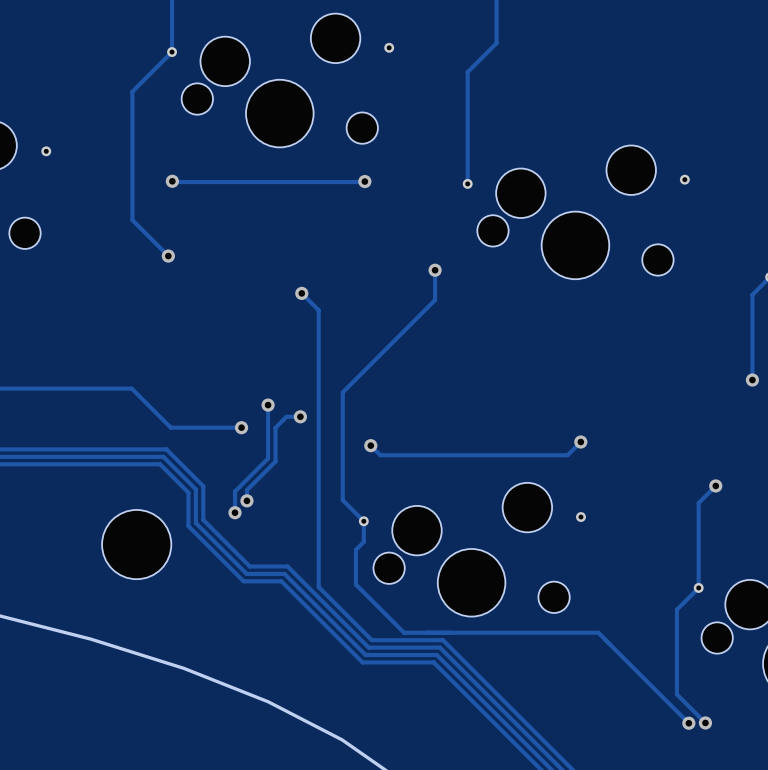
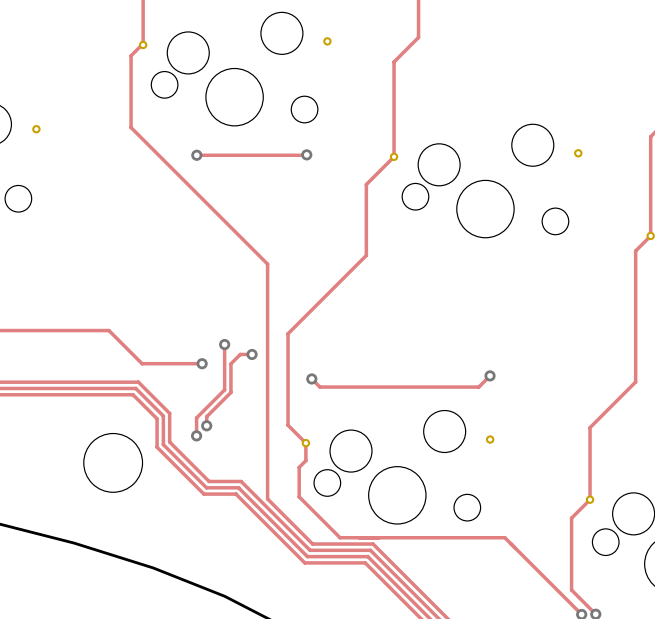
track: none -> (141, 44) (131, 55) (131, 127) (253, 249)
track: (172, 52) (132, 91) (132, 220) (168, 256) -> none
track: (172, 181) (235, 182) -> none
via: (172, 181) -> none
via: none -> (196, 155)
track: none -> (394, 156) (366, 184) (366, 230)
via: (168, 256) -> none
via: (435, 270) -> none
via: (301, 293) -> none
track: none -> (635, 323) (635, 382) (604, 413)
via: (752, 380) -> none
via: (715, 485) -> none

